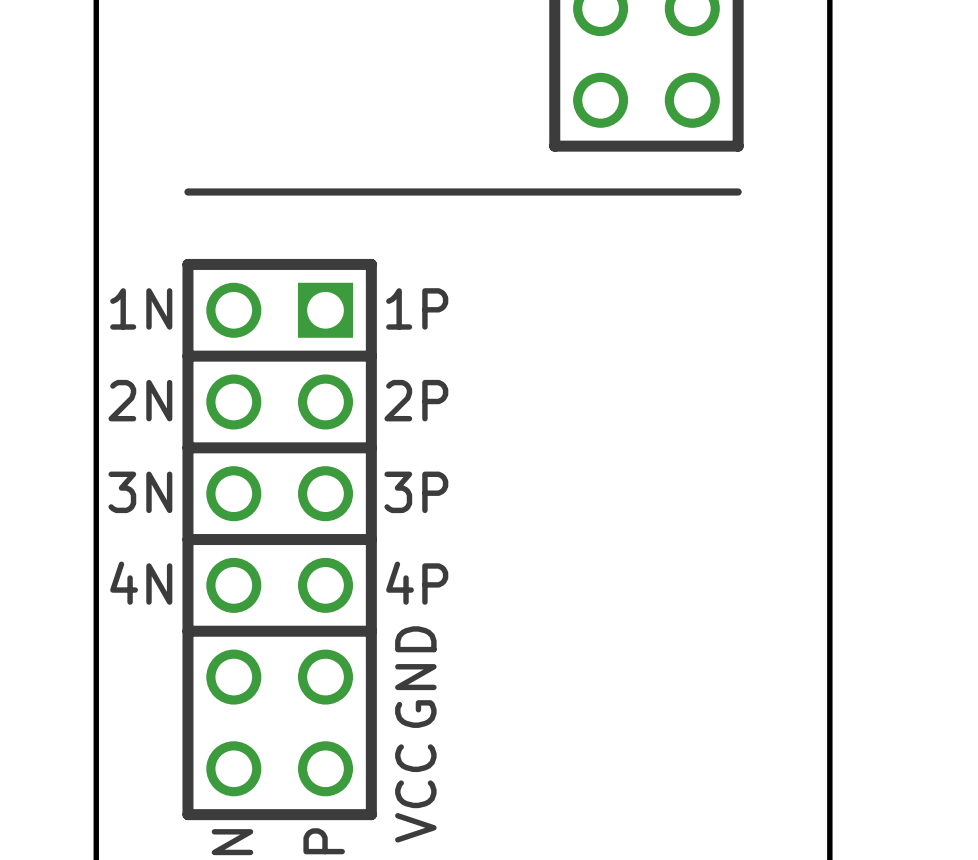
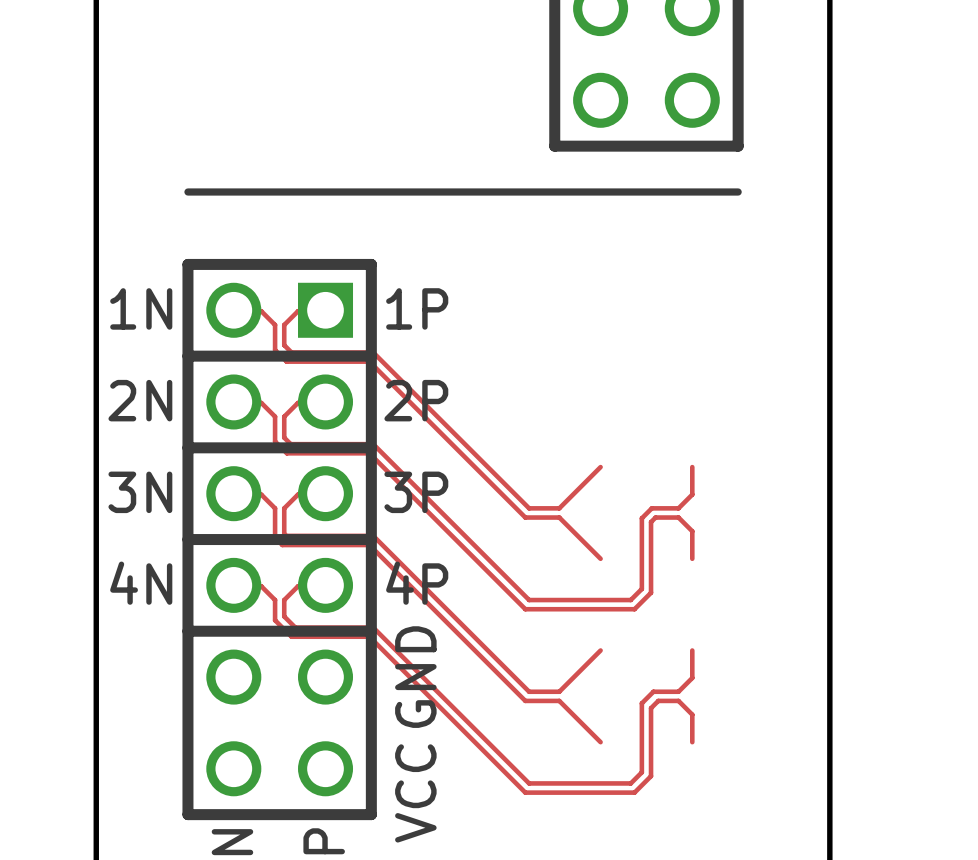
track: none -> (233, 311) (261, 311) (275, 324) (275, 350) (286, 361) (369, 361) (525, 517) (559, 517) (600, 558)
track: none -> (325, 311) (298, 311) (284, 324) (284, 345) (291, 352) (373, 352) (529, 508) (559, 508) (600, 467)
track: none -> (233, 402) (261, 402) (275, 416) (275, 441) (286, 453) (369, 453) (525, 609) (634, 609) (651, 592) (651, 522) (655, 517) (678, 517) (692, 531) (692, 558)
track: none -> (325, 402) (298, 402) (284, 416) (284, 437) (290, 444) (373, 444) (529, 600) (630, 600) (641, 588) (641, 518) (651, 508) (678, 508) (692, 494) (692, 467)
track: none -> (233, 494) (261, 494) (275, 508) (275, 537) (282, 545) (369, 545) (525, 700) (559, 700) (600, 742)
track: none -> (325, 494) (298, 494) (284, 508) (284, 533) (286, 535) (373, 535) (529, 691) (559, 691) (600, 650)
track: none -> (233, 586) (261, 586) (275, 600) (275, 620) (291, 636) (369, 636) (525, 792) (634, 792) (651, 776) (651, 708) (658, 700) (678, 700) (692, 714) (692, 742)
track: none -> (325, 586) (298, 586) (284, 600) (284, 616) (295, 627) (373, 627) (529, 783) (630, 783) (641, 772) (641, 703) (653, 691) (678, 691) (692, 677) (692, 650)

